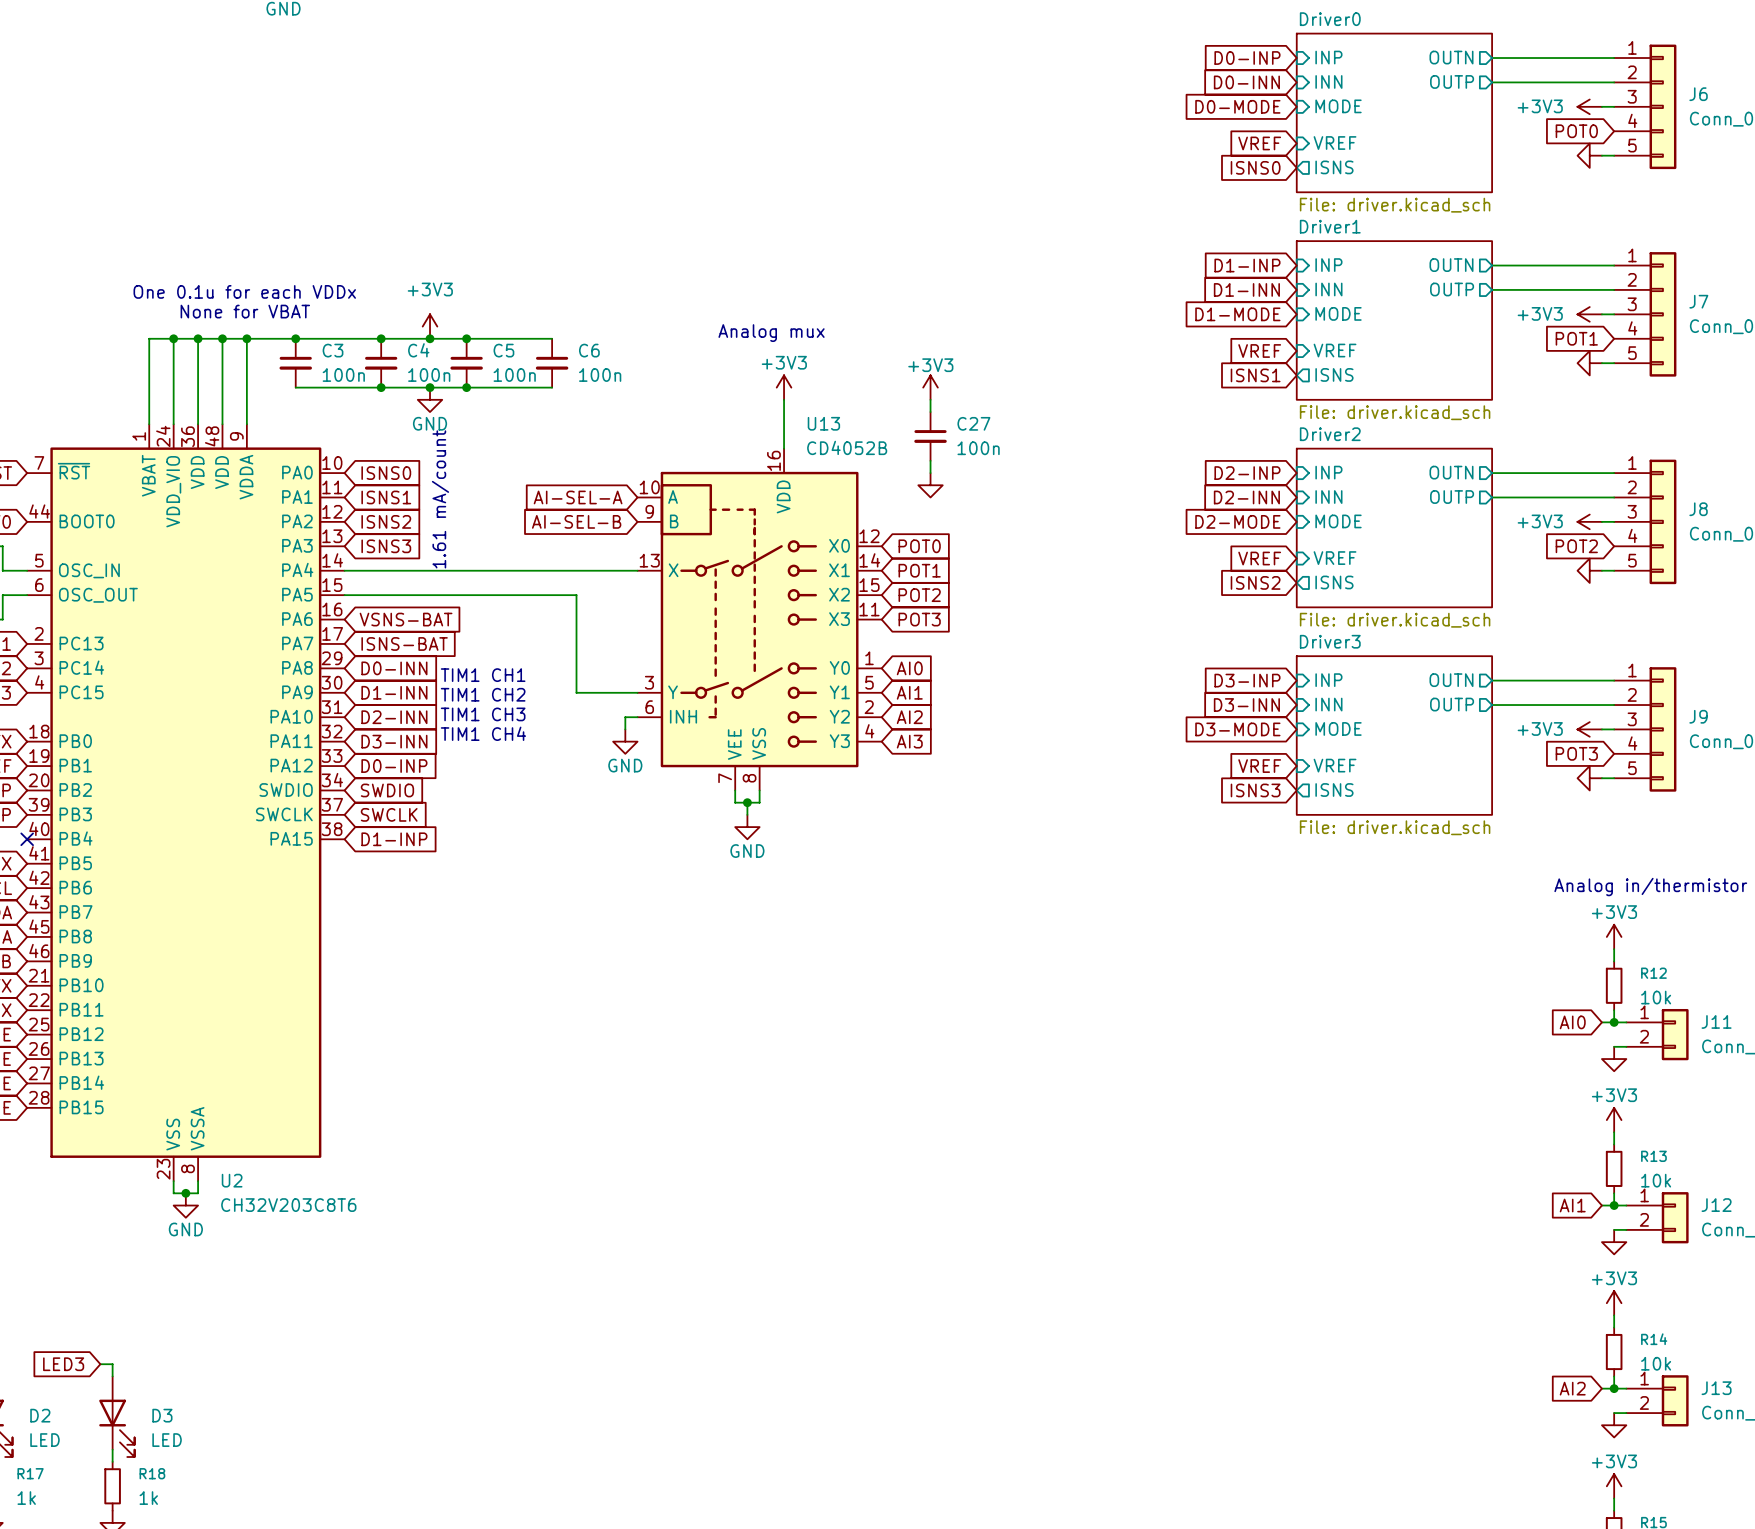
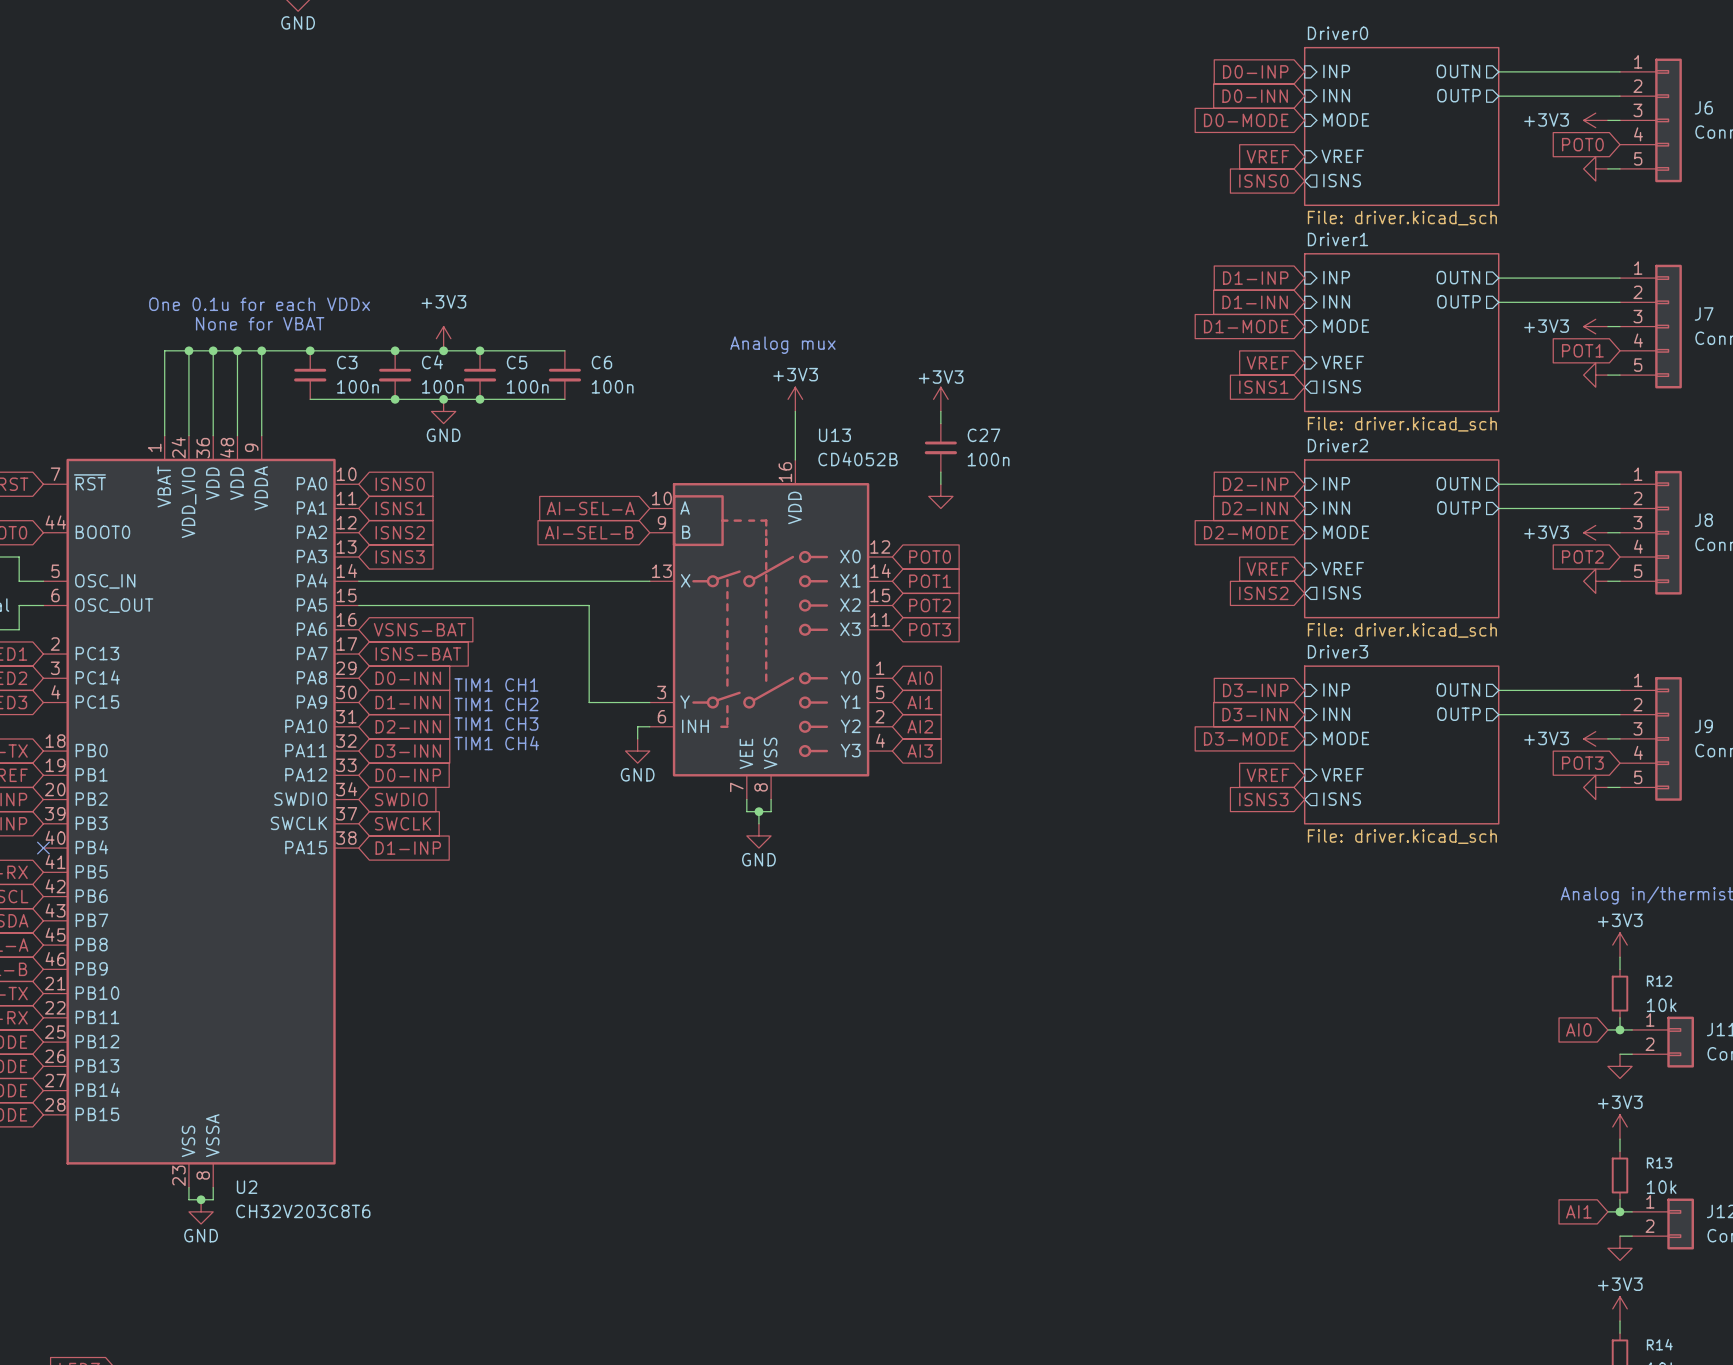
text: 1.61 mA/count (440, 499) -> none

